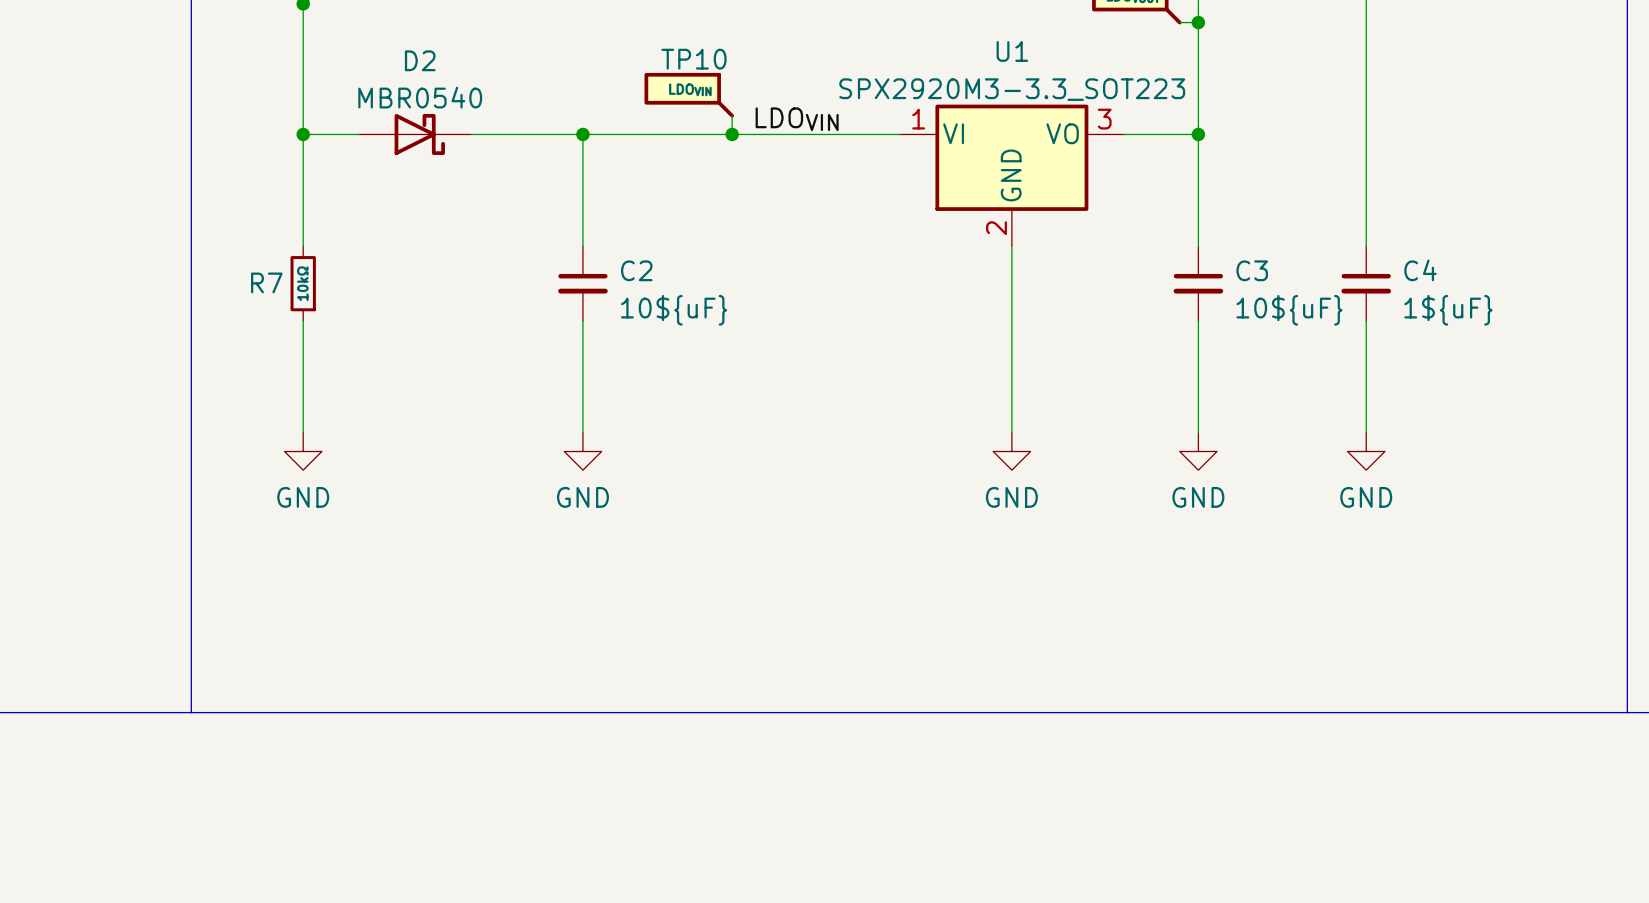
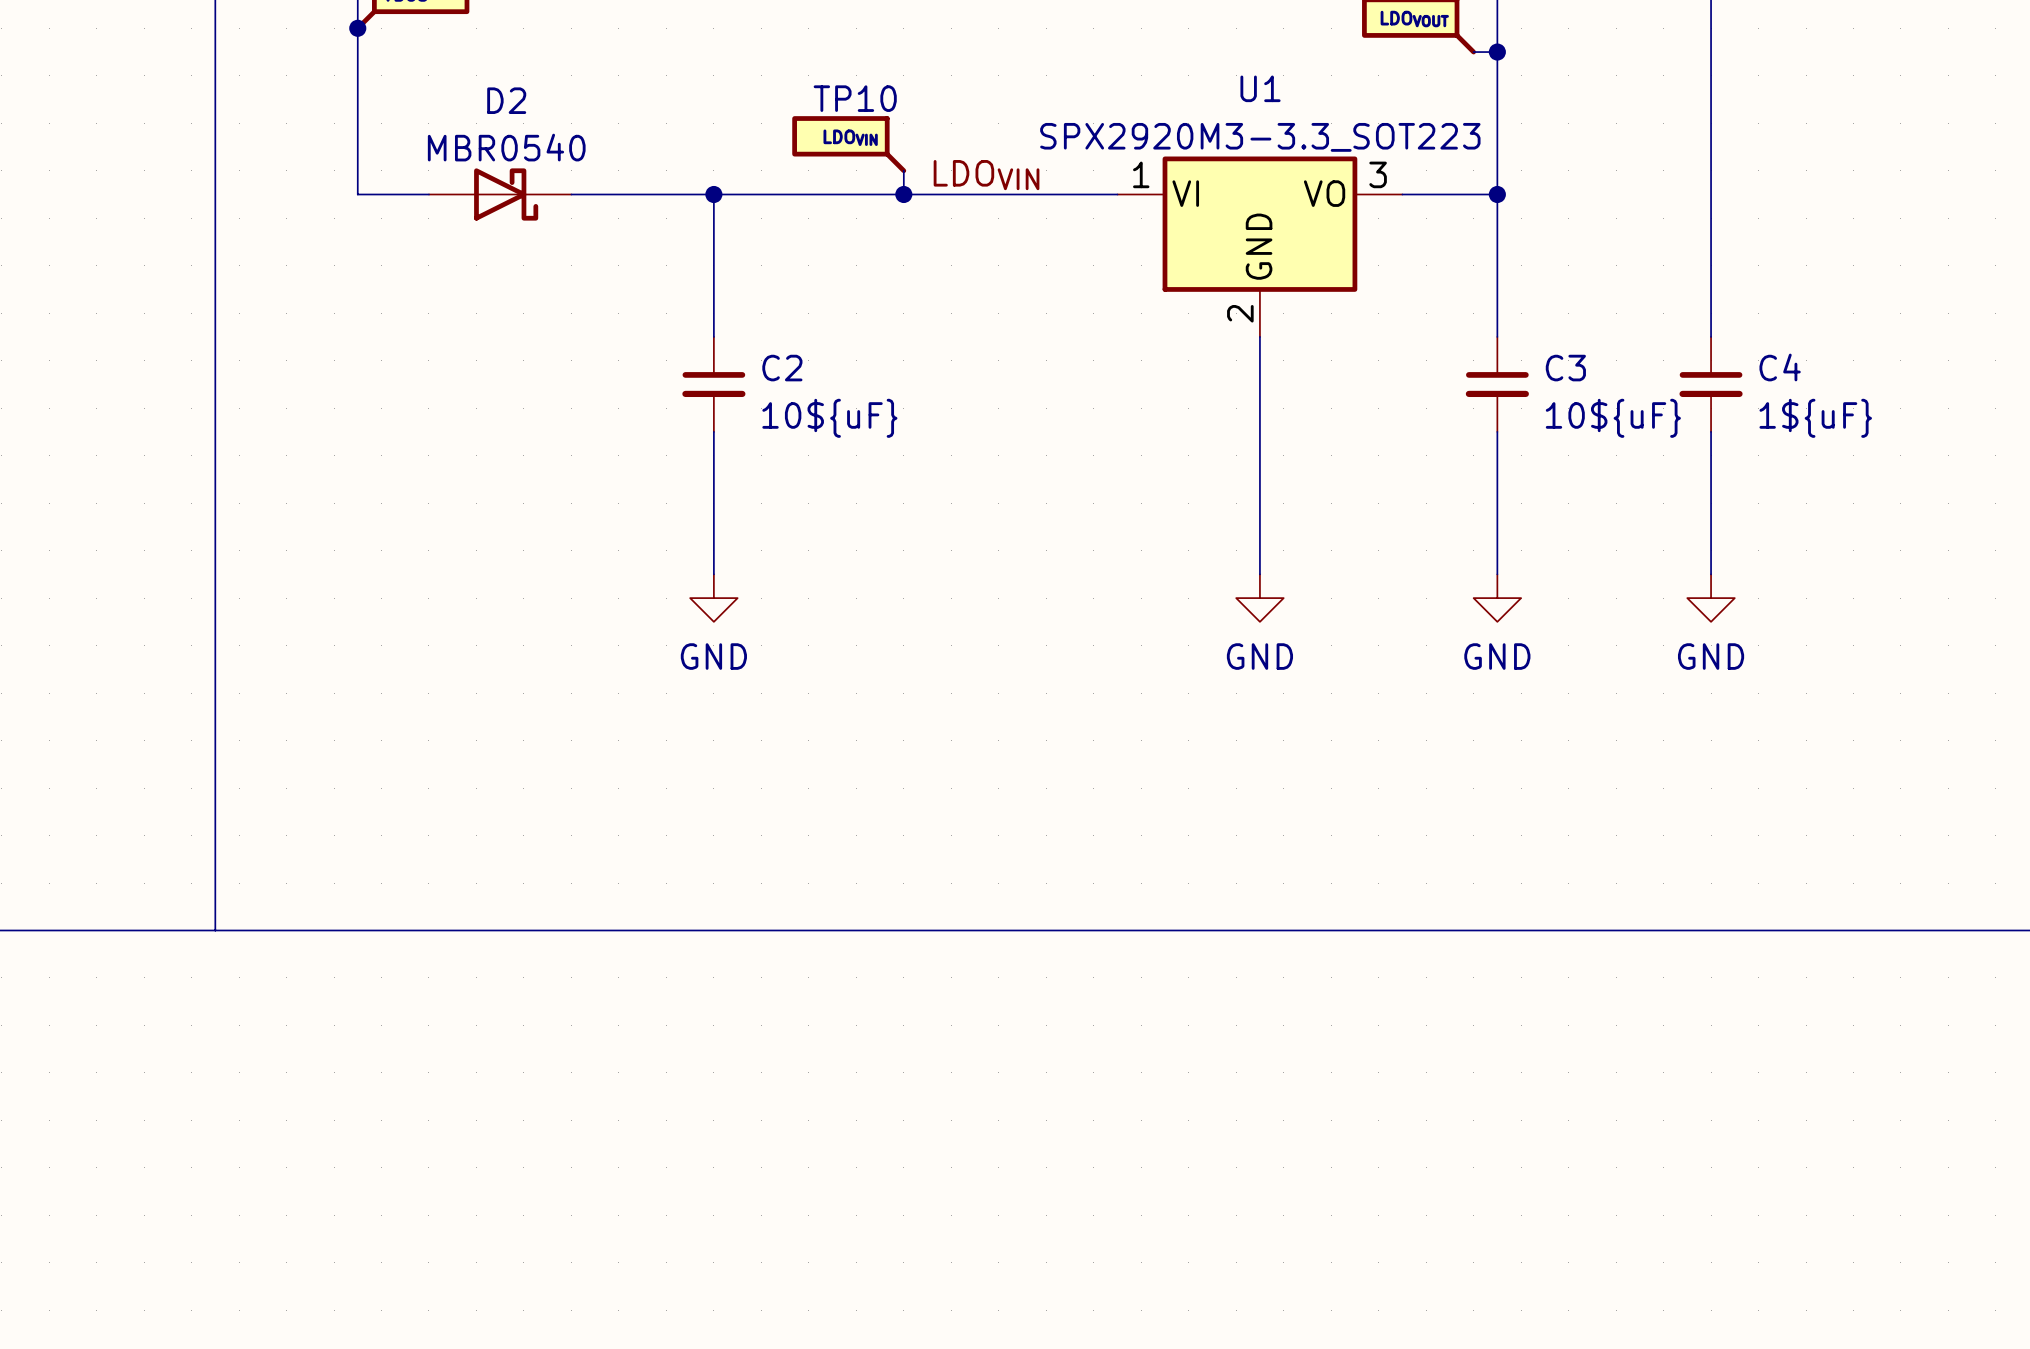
wire: (303, 134) (303, 246) -> none
junction: (303, 134) -> none
R7: 10kΩ (303, 283) -> none
wire: (303, 320) (303, 432) -> none
power symbol: GND (303, 451) -> none

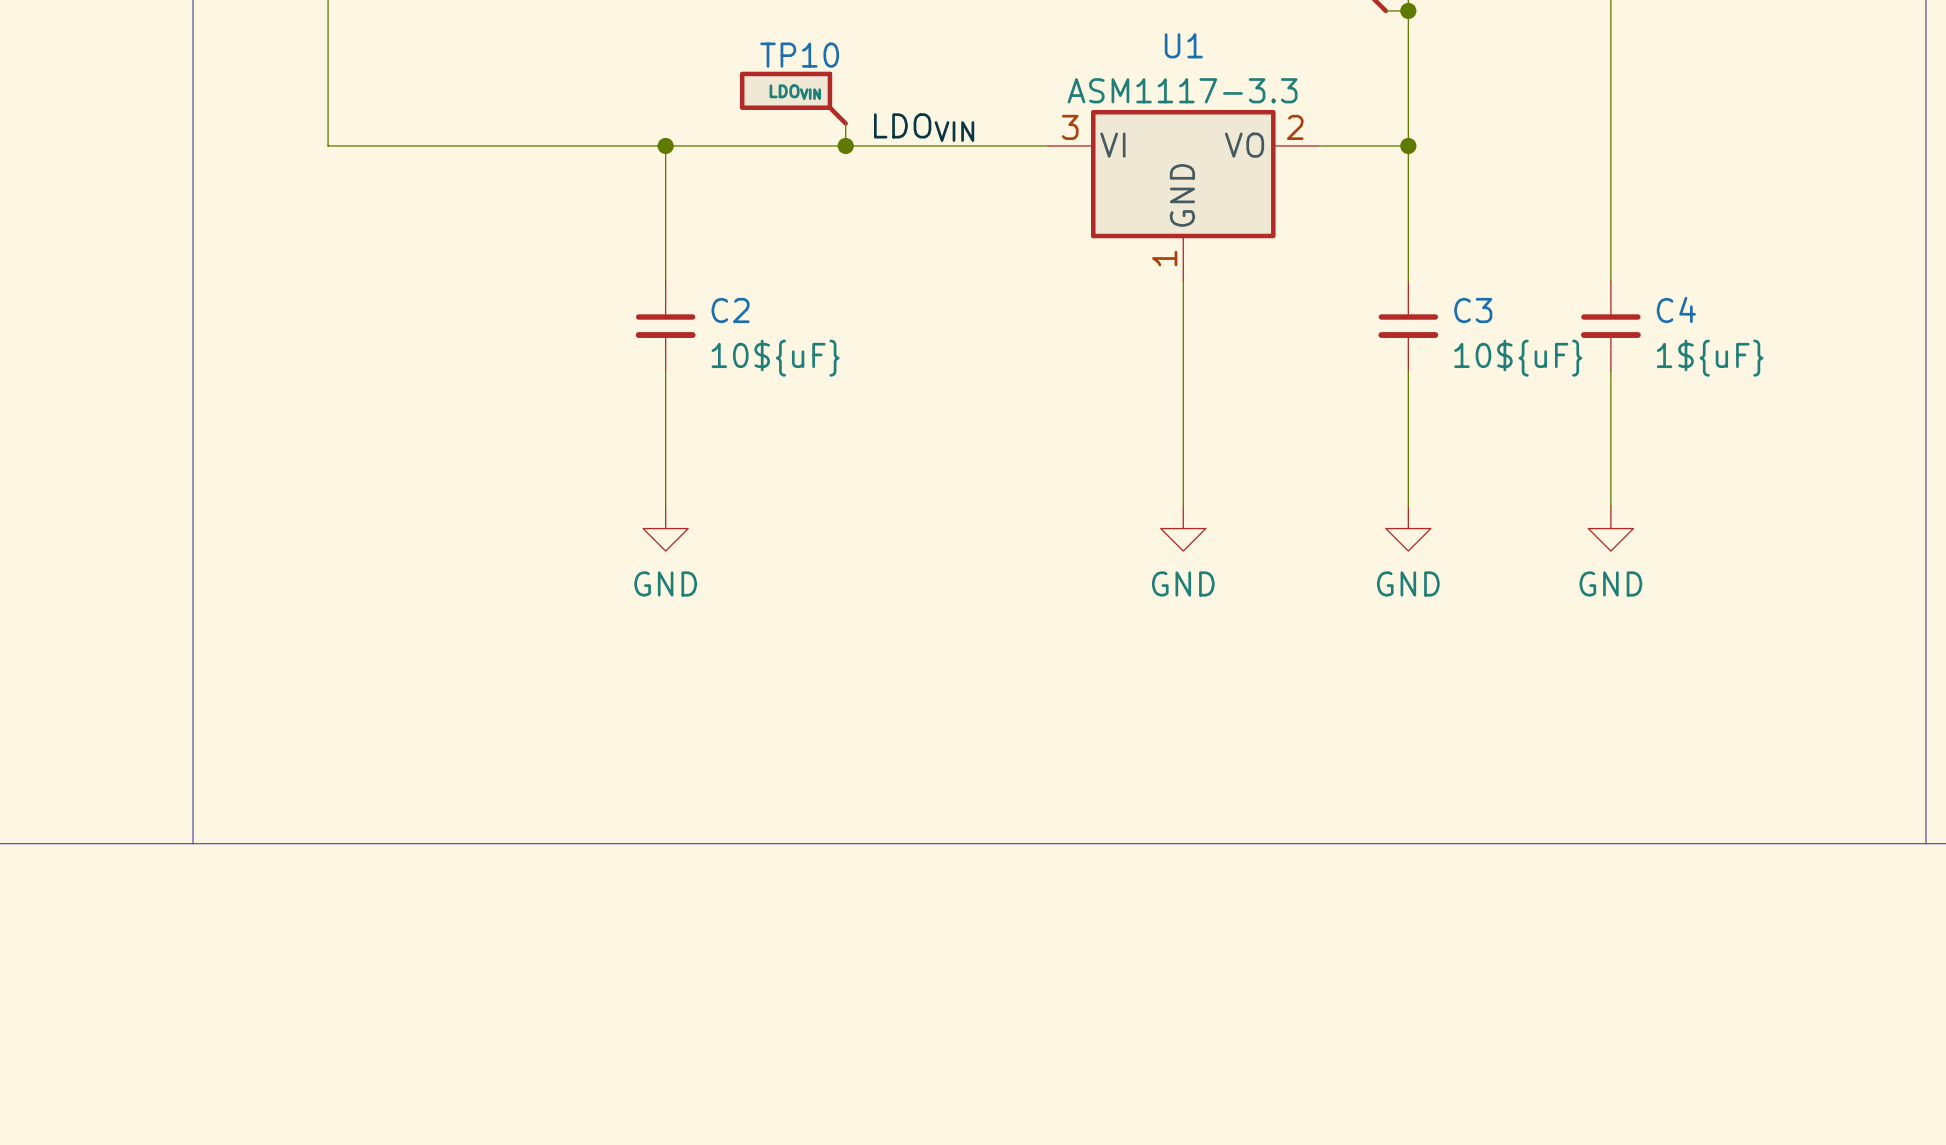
U1 value: SPX2920M3-3.3_SOT223 (1260, 137) -> ASM1117-3.3 (1182, 90)
U1 pin number: 1 (1141, 174) -> 3 (1070, 127)
U1 pin number: 3 (1378, 174) -> 2 (1295, 127)
D2: MBR0540 (500, 194) -> none
U1 pin number: 2 (1240, 313) -> 1 (1164, 258)

